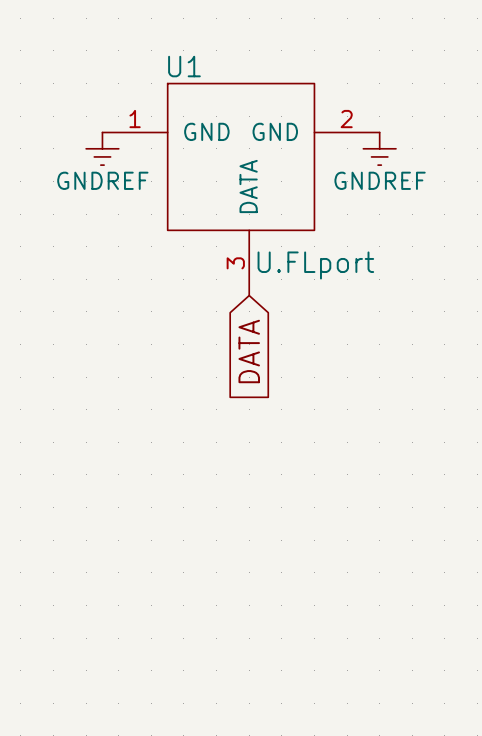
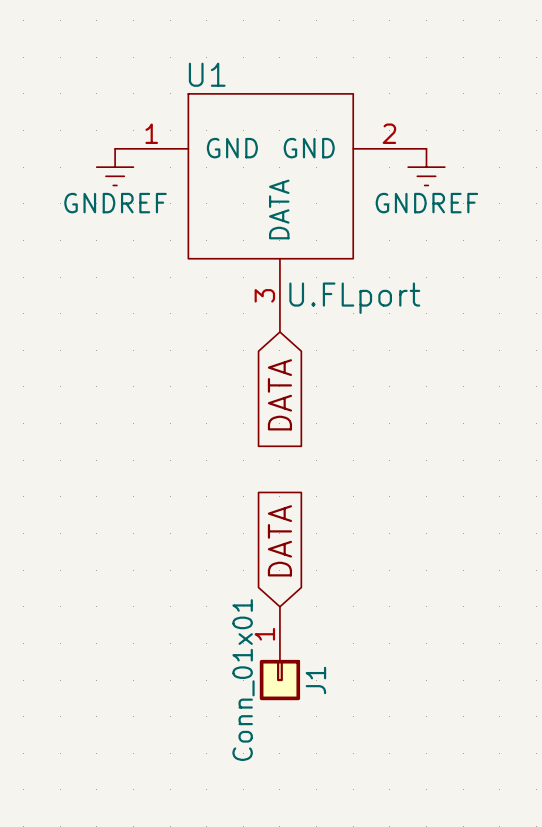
global label: none -> DATA (279, 540)
J1: none -> Conn_01x01 (279, 653)

